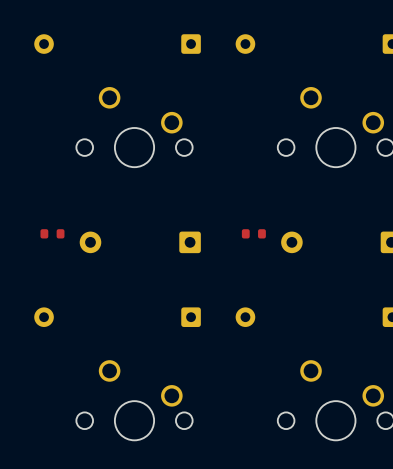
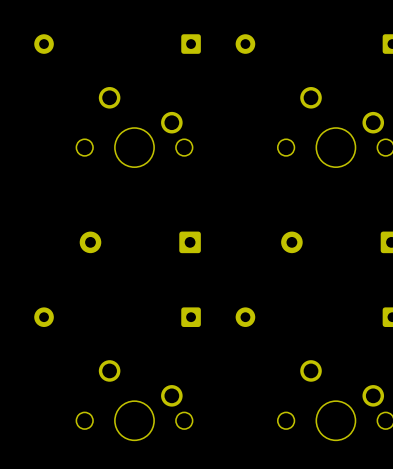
part: (52, 233) -> none
part: (253, 233) -> none

